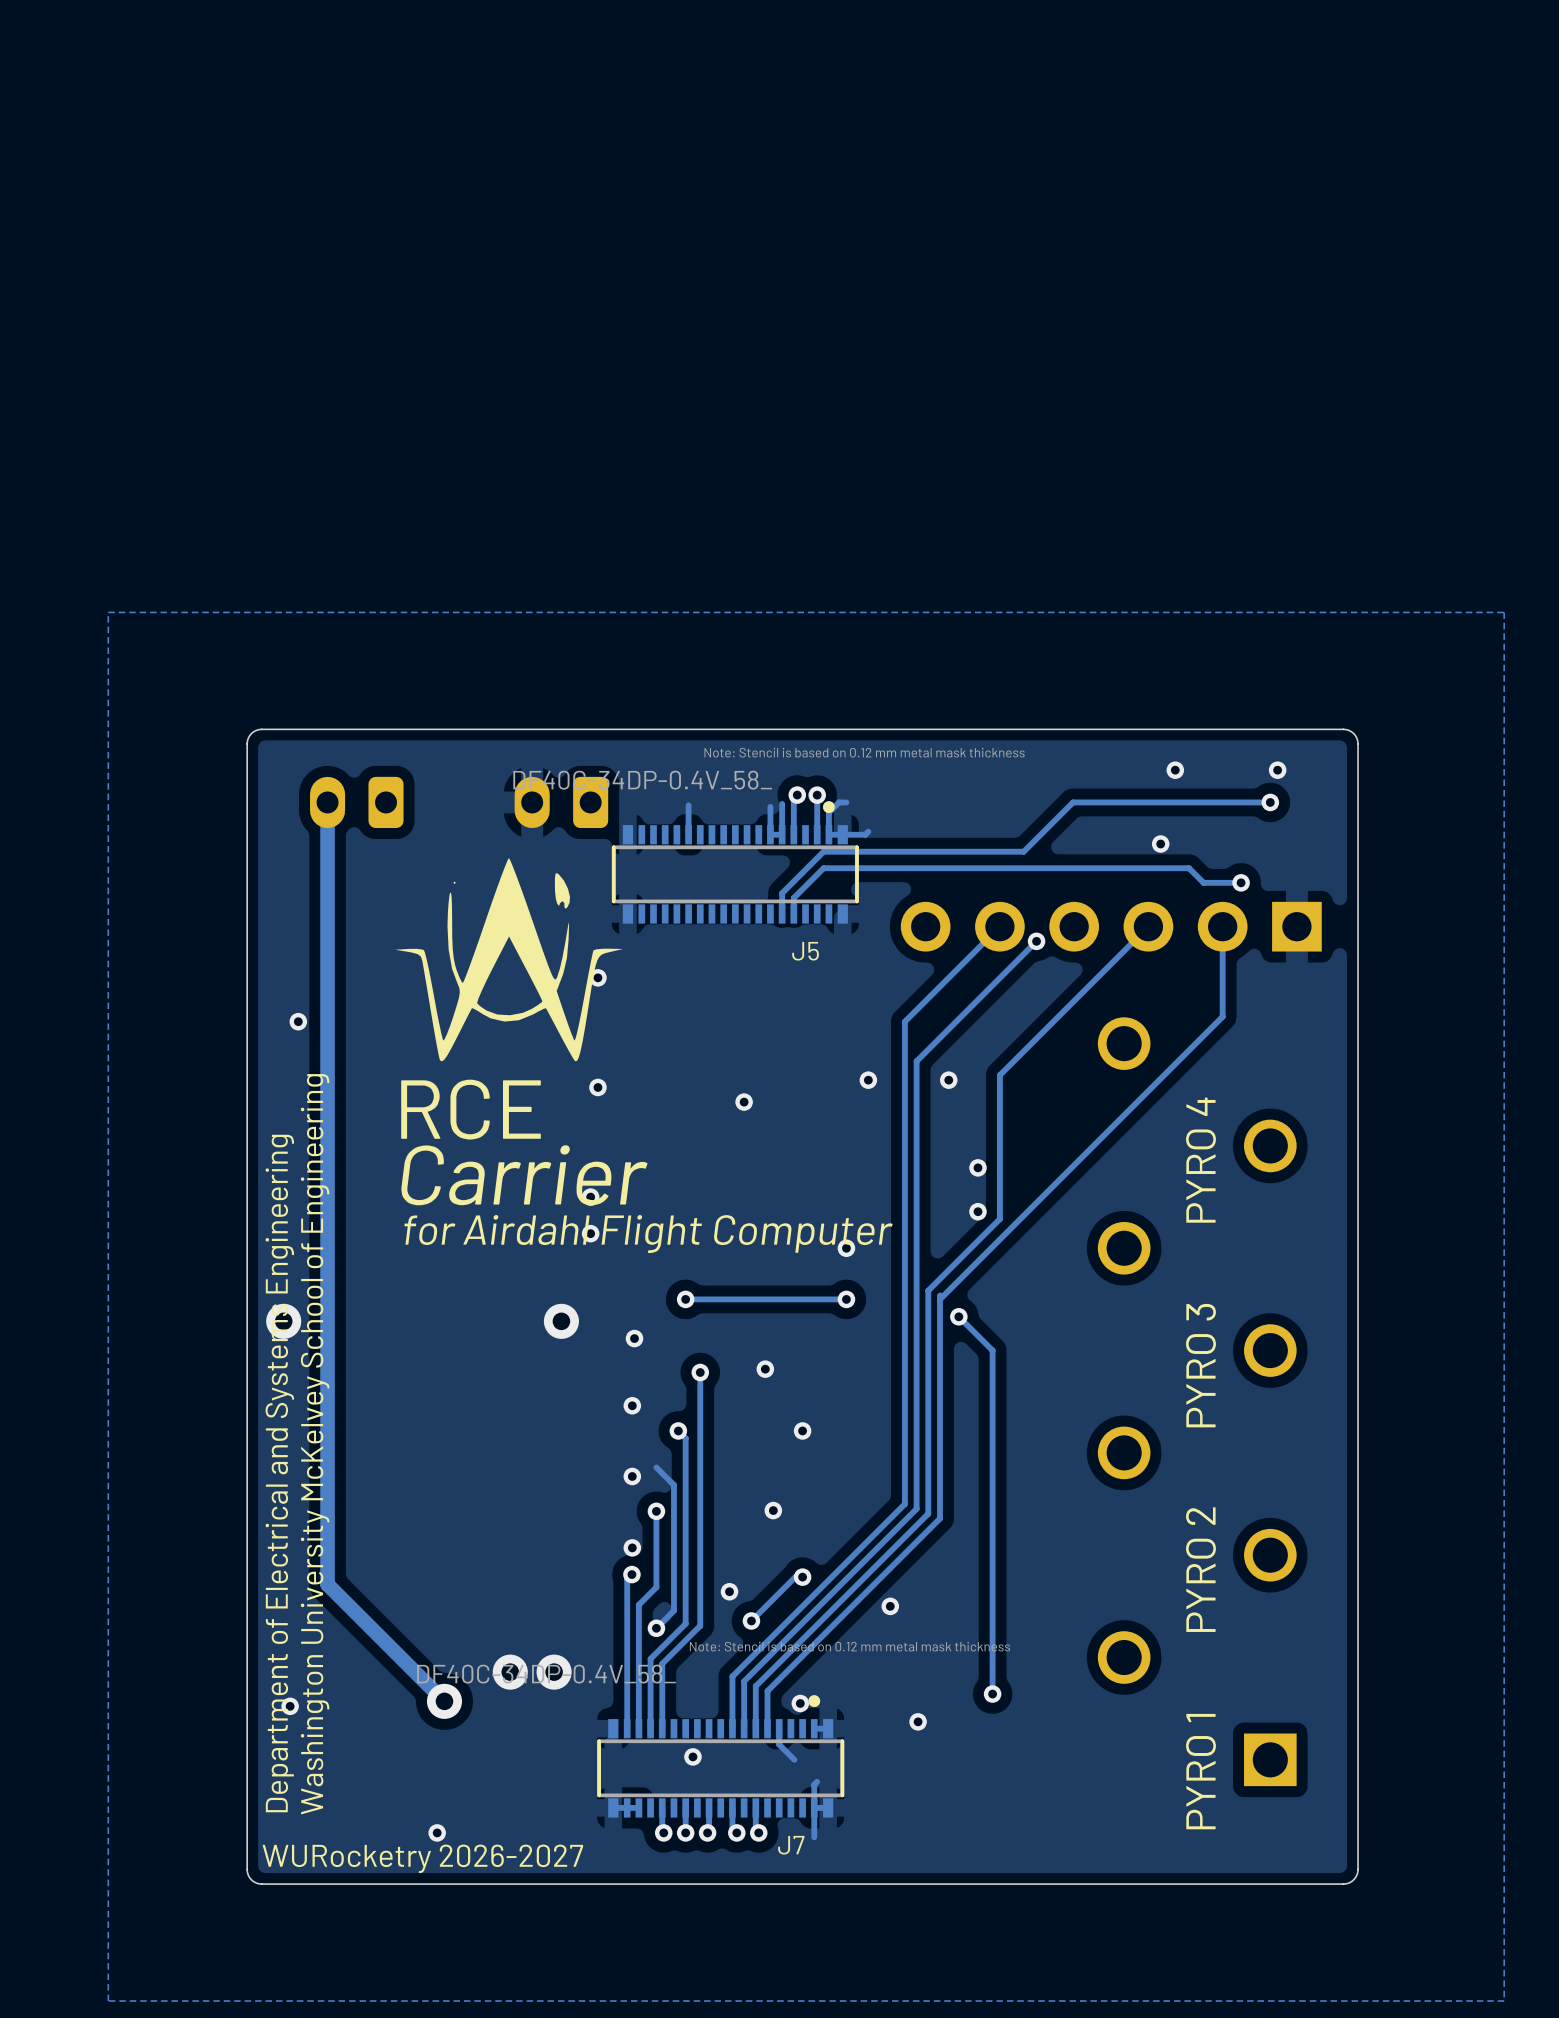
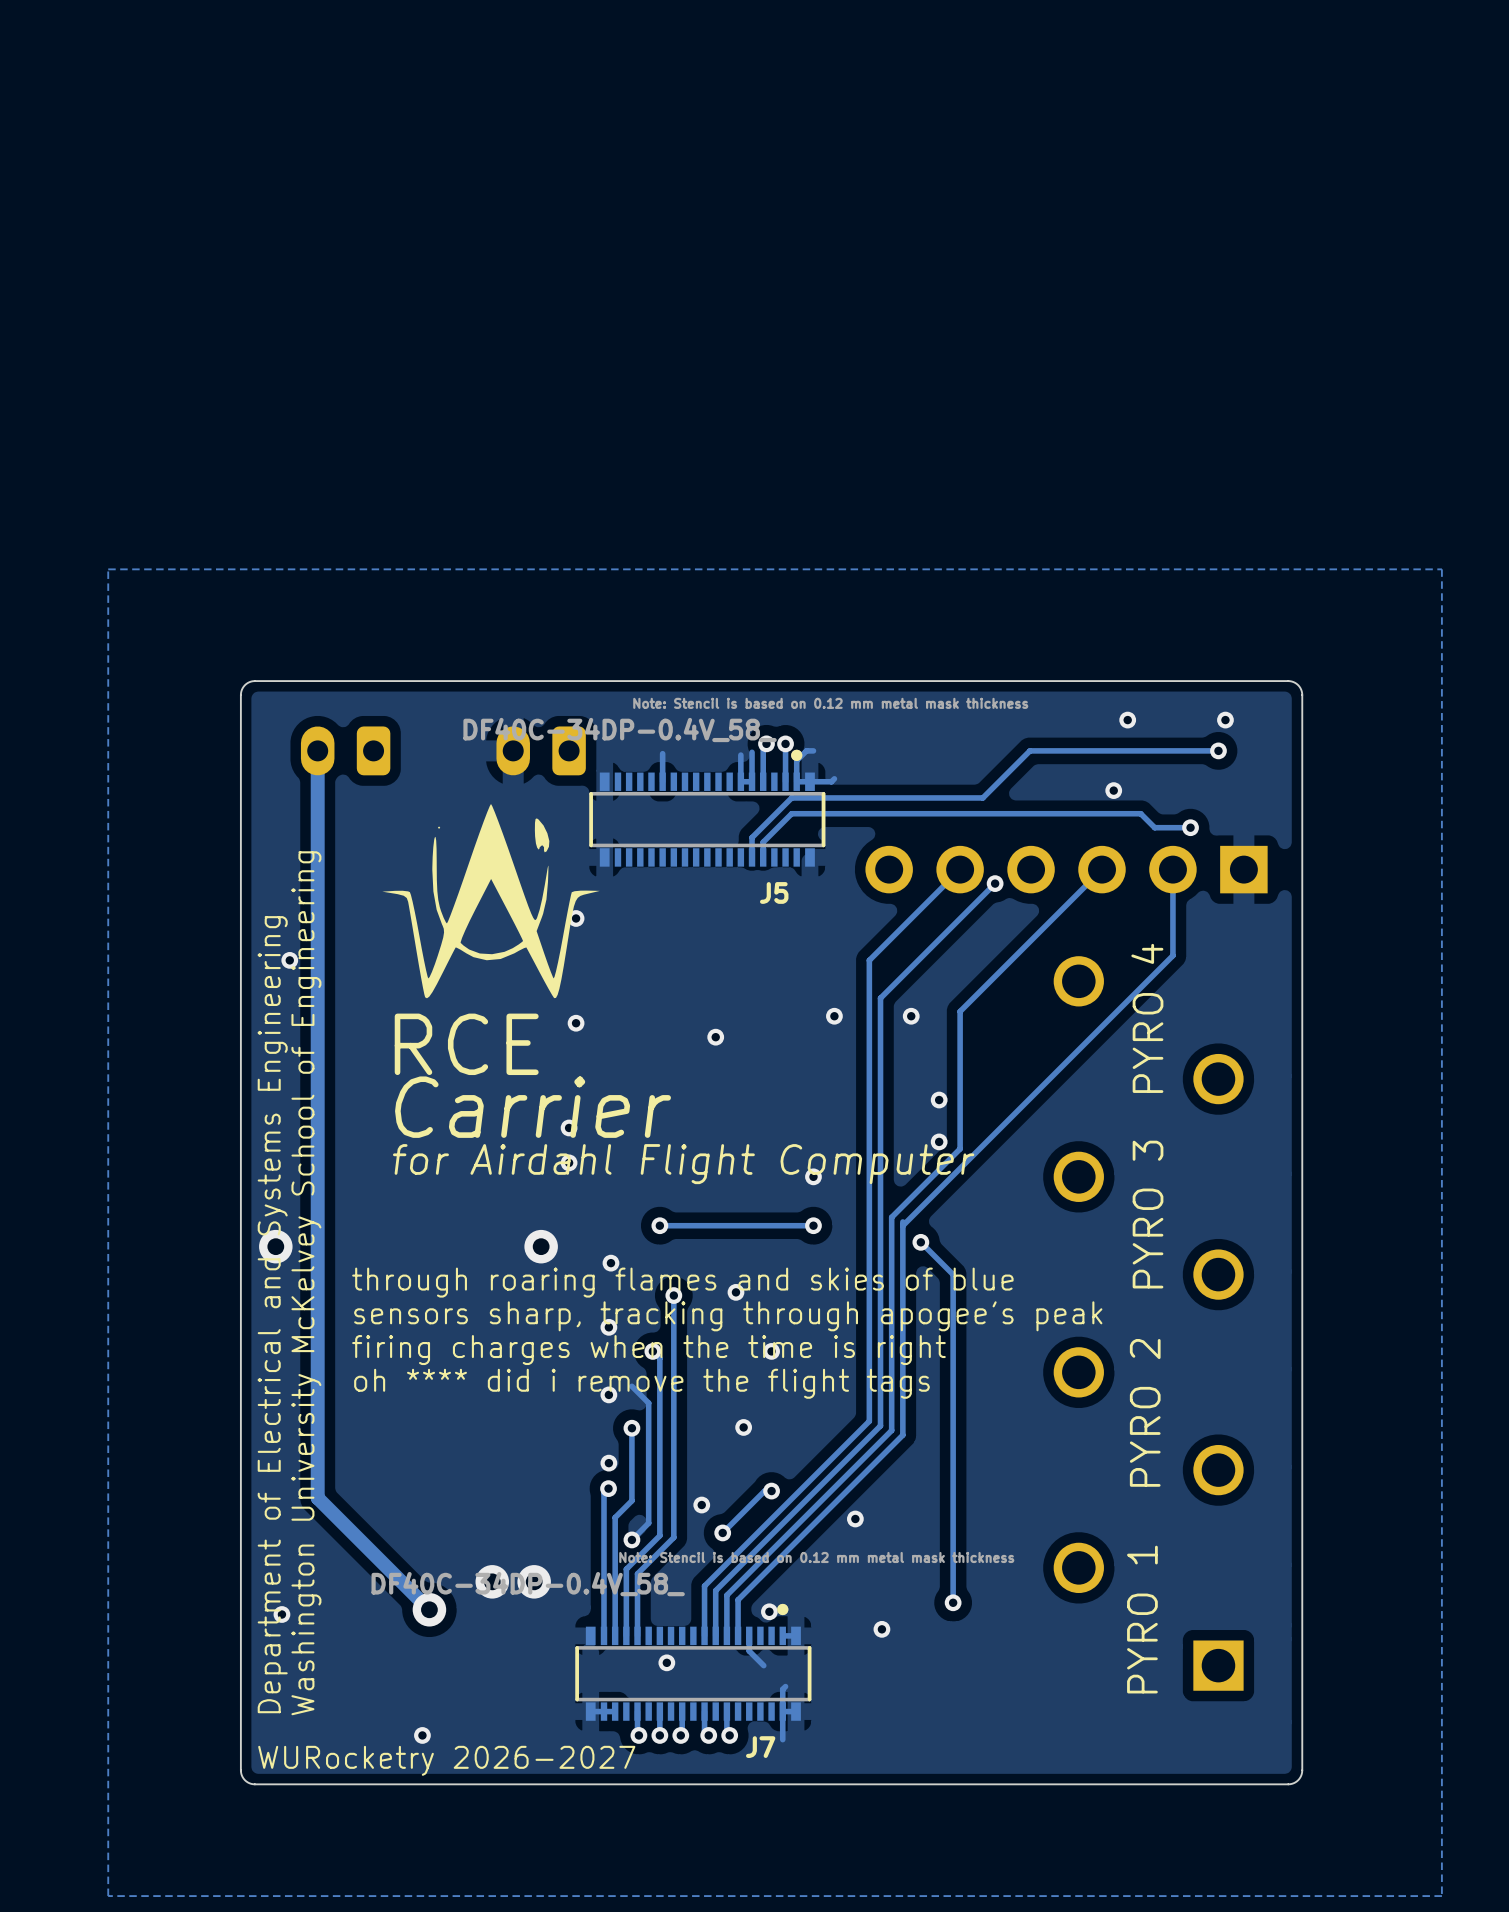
text position: PYRO 4 (1200, 1160) -> PYRO 4 (1147, 1018)
text: none -> through roaring flames and skies of blue (682, 1282)
text position: PYRO 3 (1200, 1365) -> PYRO 3 (1148, 1214)
text: none -> sensors sharp, tracking through apogee's peak (728, 1316)
text: none -> firing charges when the time is right (648, 1350)
text: none -> oh **** did i remove the flight tags (641, 1383)
text position: PYRO 2 (1200, 1569) -> PYRO 2 (1145, 1412)
text position: PYRO 1 (1200, 1771) -> PYRO 1 (1142, 1619)

